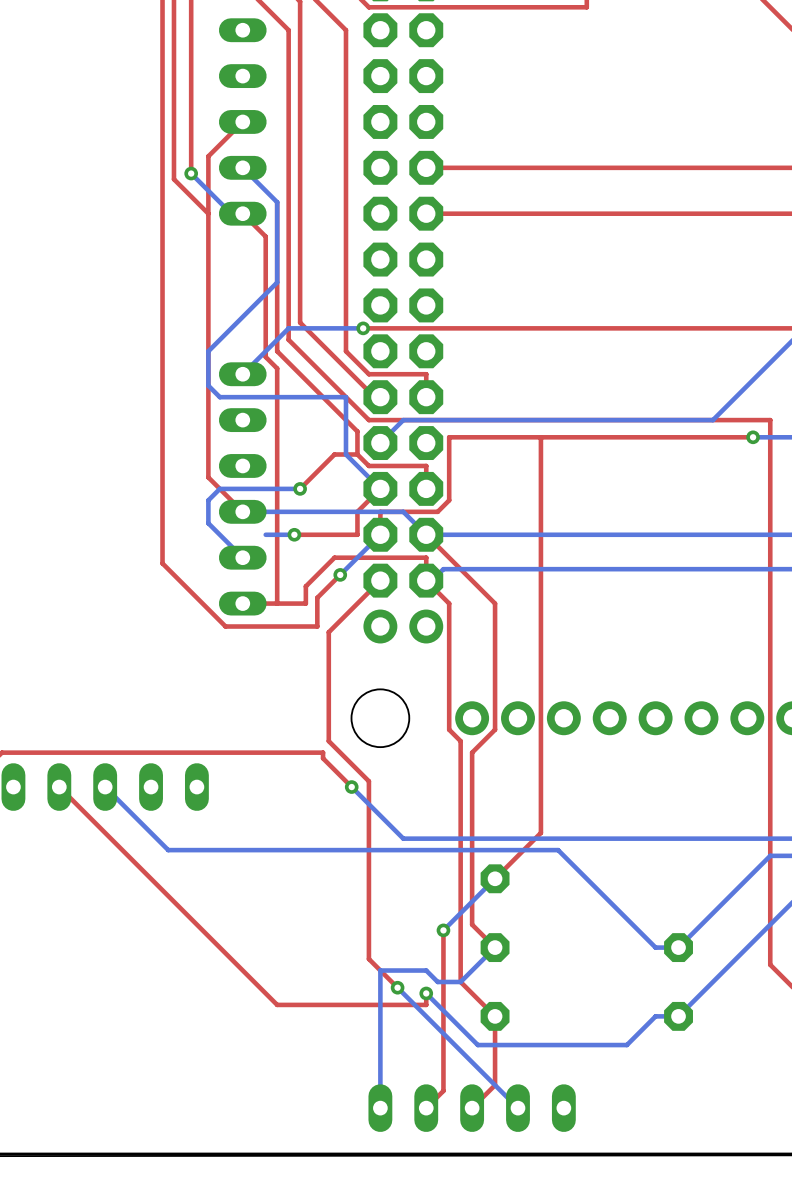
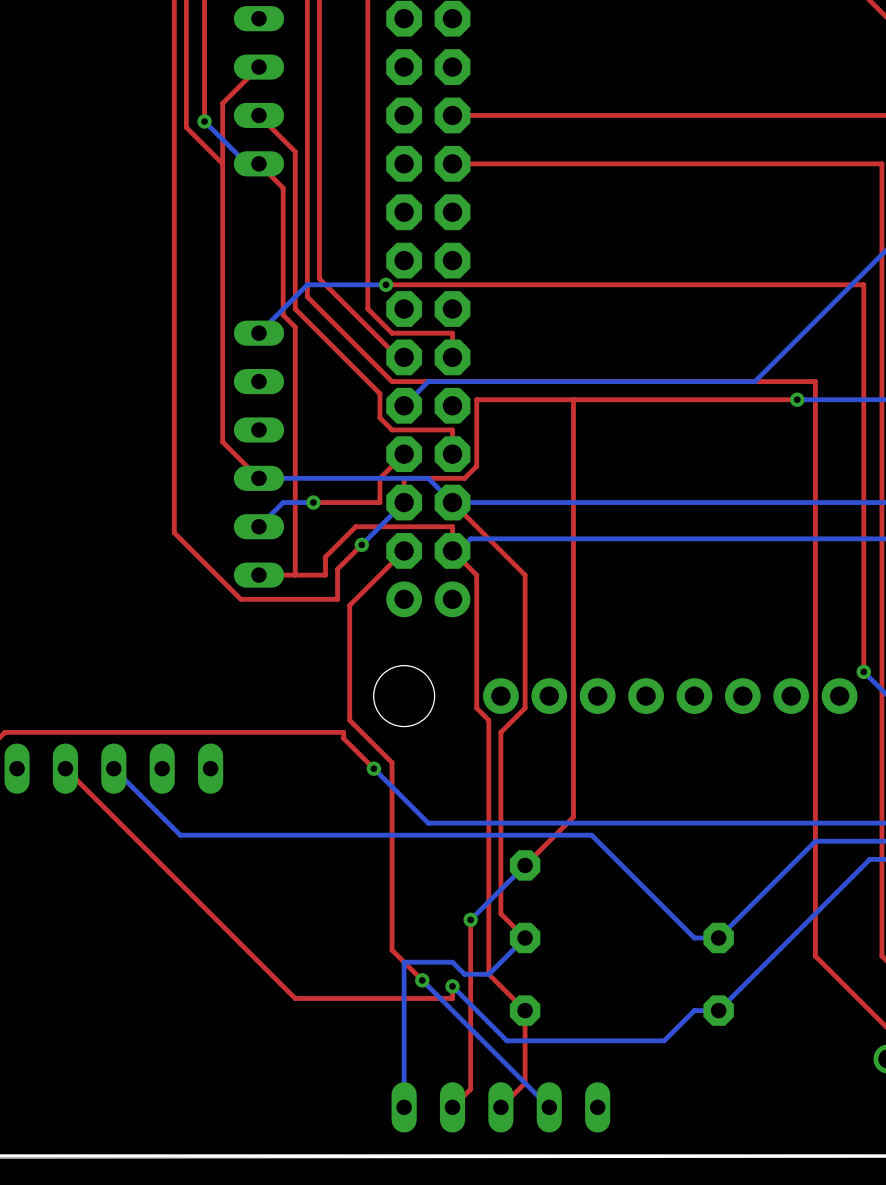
bottom track: (242, 167) (277, 202) (277, 282) (208, 351) (208, 385) (219, 397) (345, 397) (345, 454) (380, 488) -> none
top track: none -> (258, 115) (295, 151)
top track: (357, 454) (334, 454) (300, 488) -> none
bottom track: (300, 488) (219, 488) (208, 500) (208, 523) (242, 557) -> (283, 502) (258, 526)
via: (300, 488) -> none

